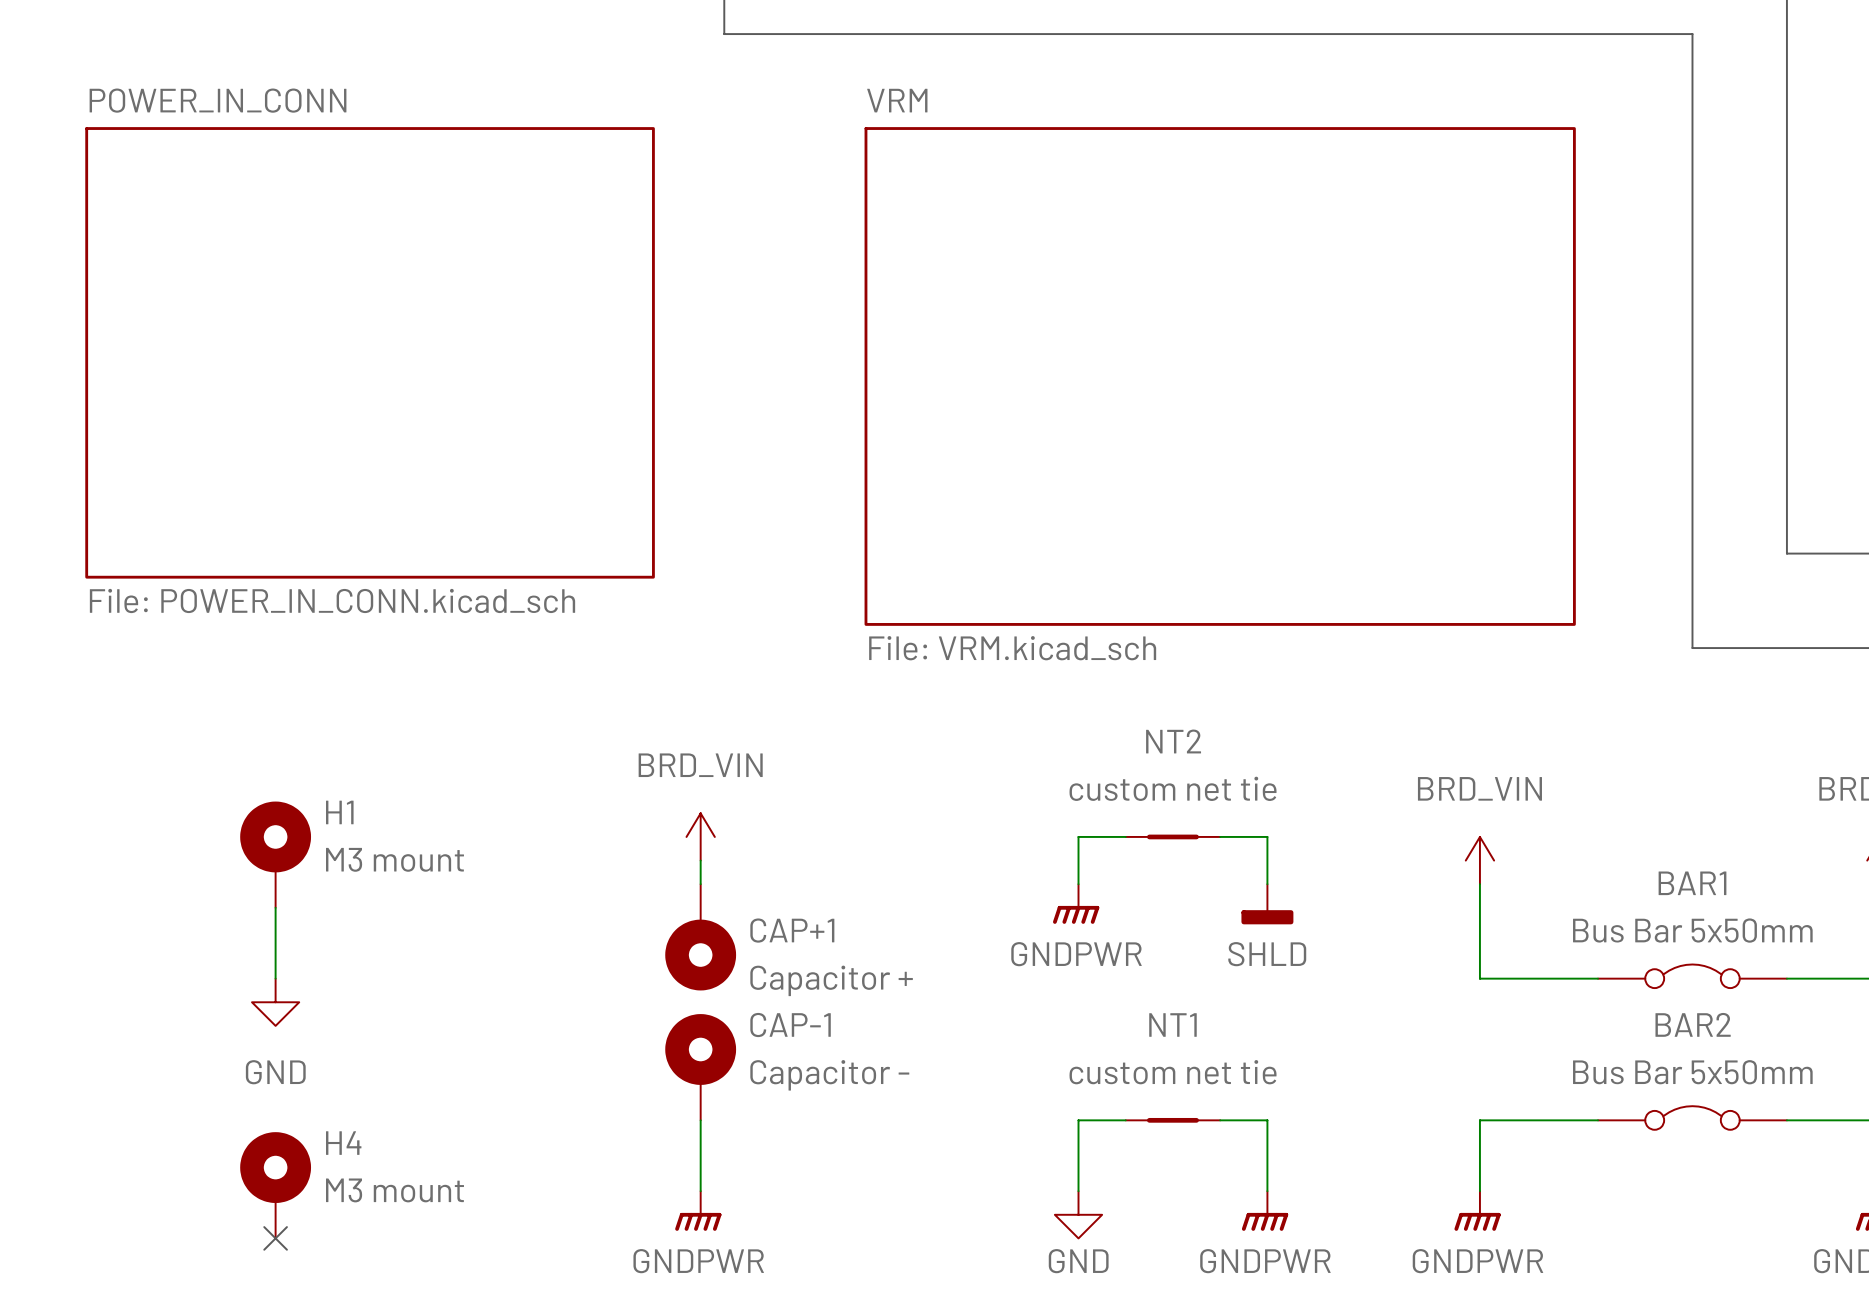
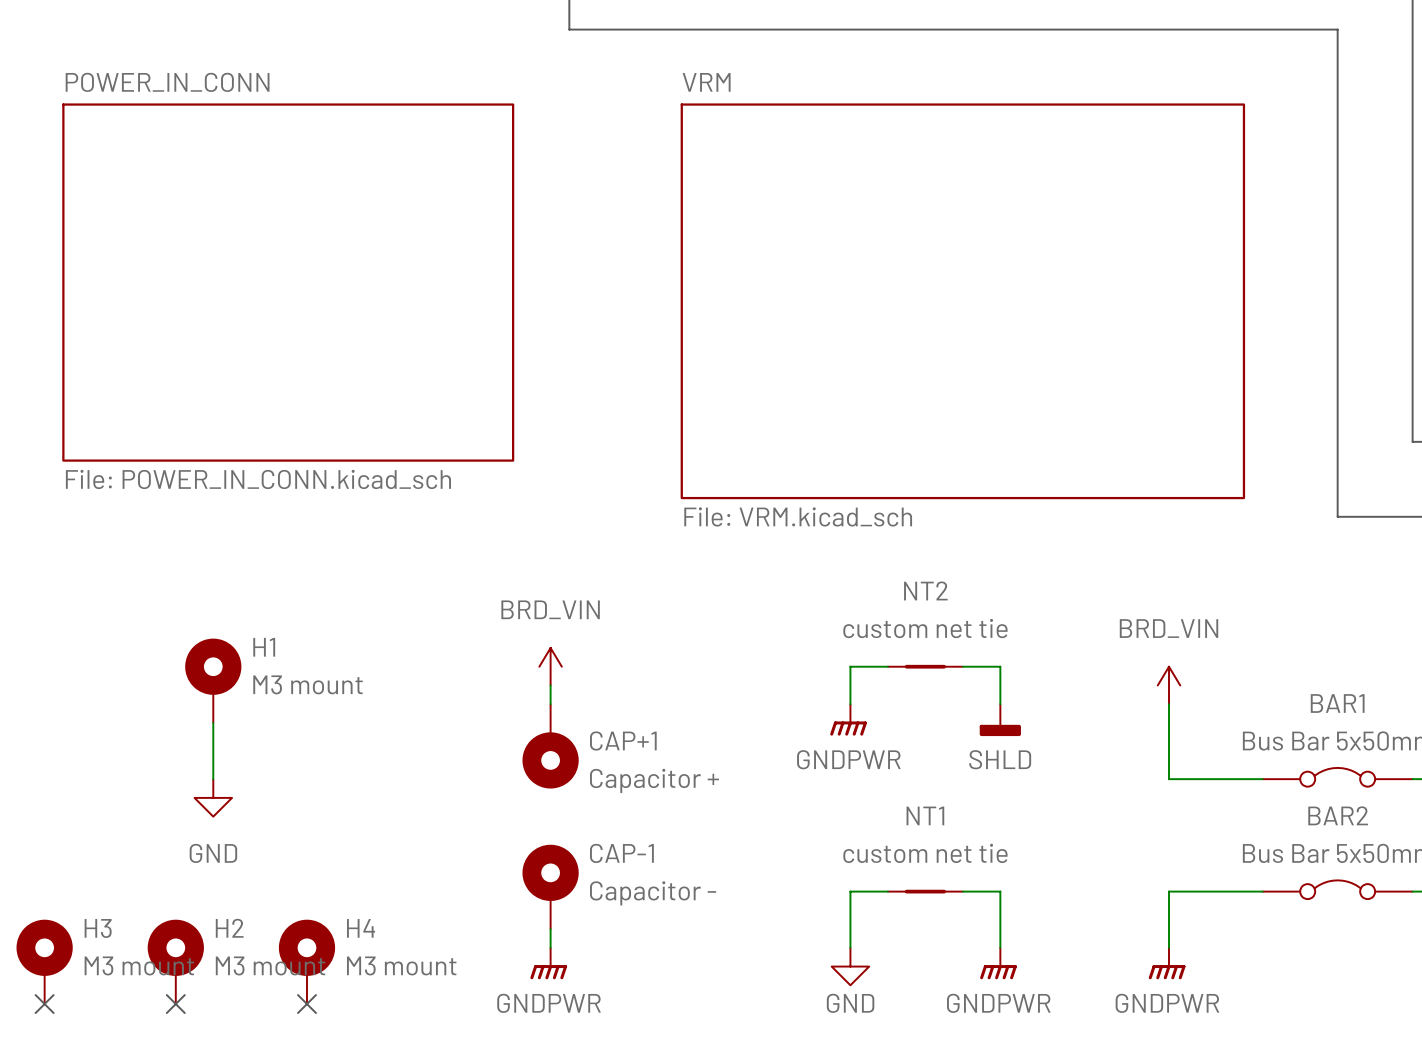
CAP-1 position: (700, 1067) -> (550, 886)
H4 position: (275, 1185) -> (306, 961)
H3: none -> M3 mount (44, 961)
H2: none -> M3 mount (175, 961)
no-connect mark position: (275, 1238) -> (175, 1004)
no-connect mark: none -> (44, 1004)
no-connect mark: none -> (306, 1004)

